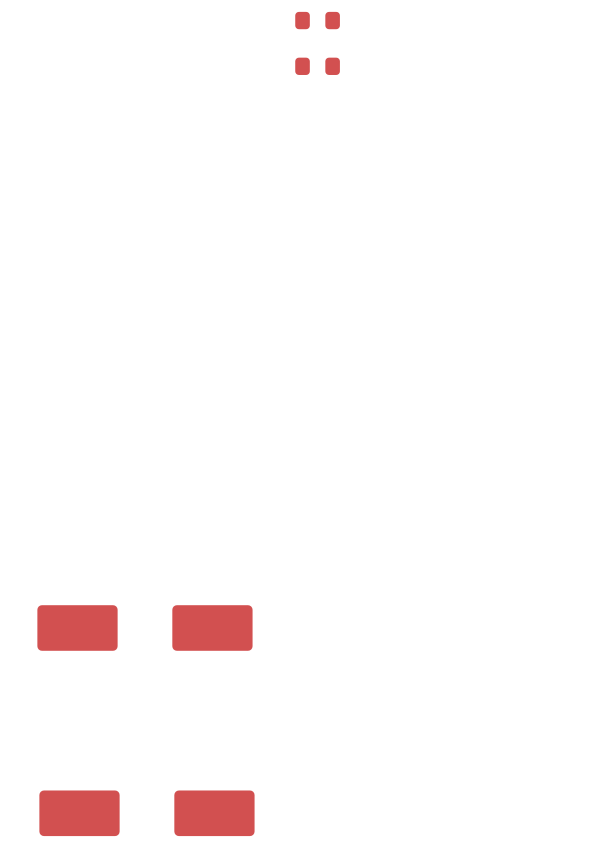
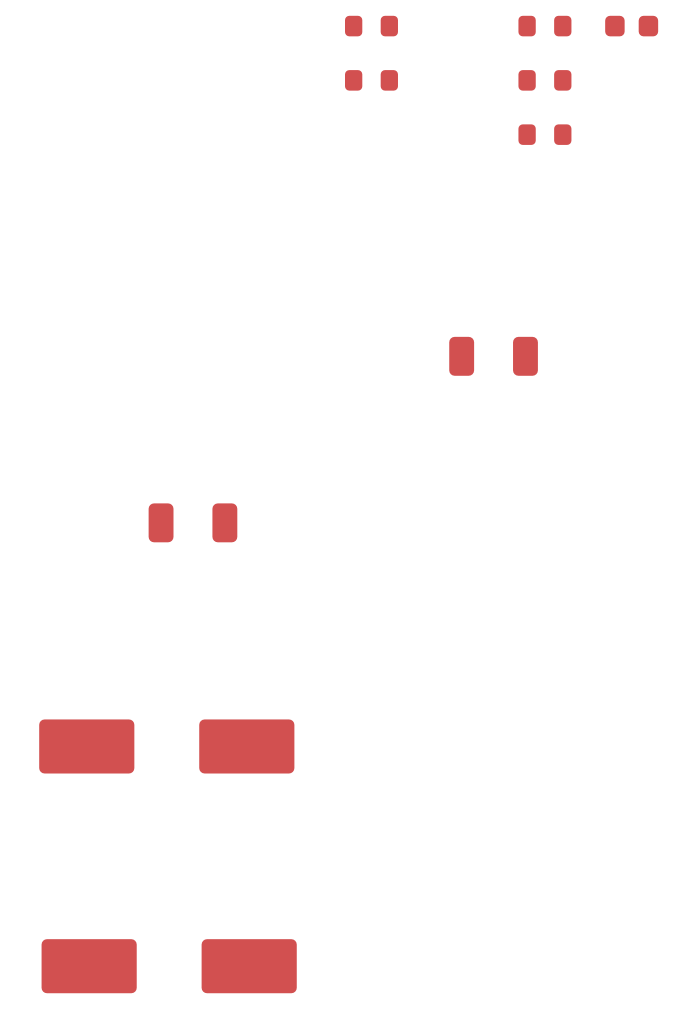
part: none -> (544, 26)
part: none -> (631, 26)
part: none -> (544, 80)
part: none -> (544, 134)
part: none -> (493, 356)
part: none -> (192, 522)

